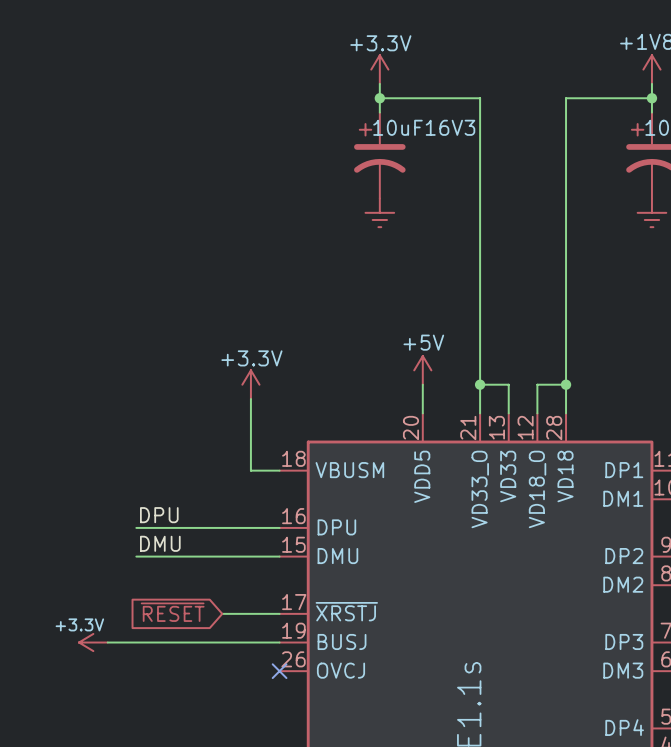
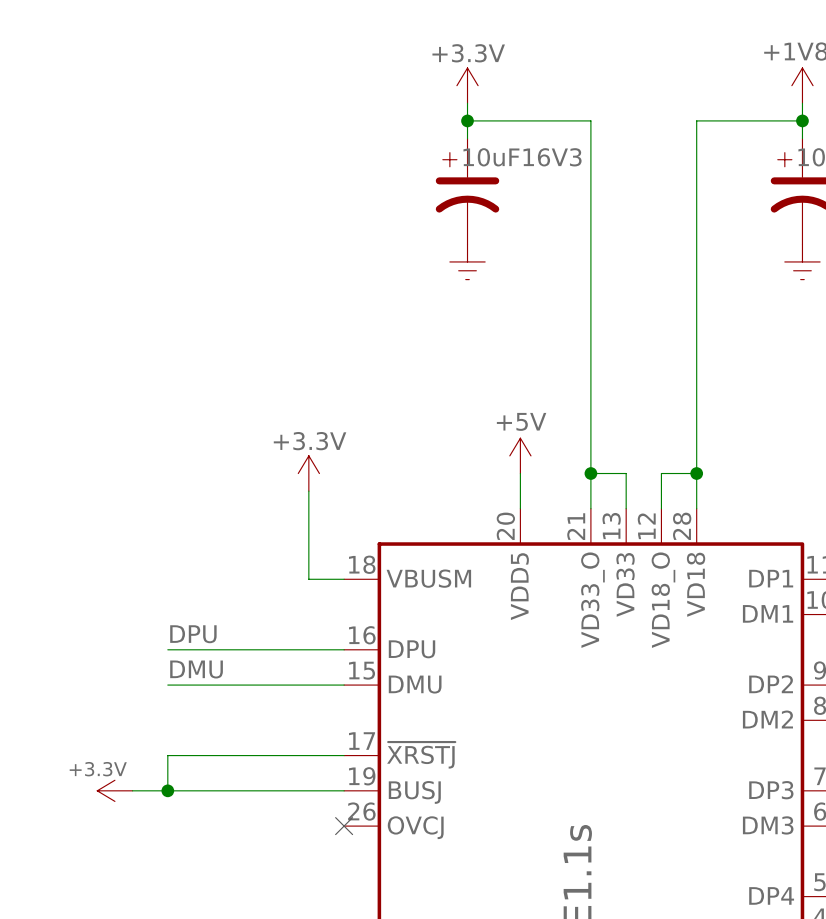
global label: ~{RESET} (172, 612) -> none
wire: none -> (273, 755) (167, 755) (167, 790)
junction: none -> (167, 790)

